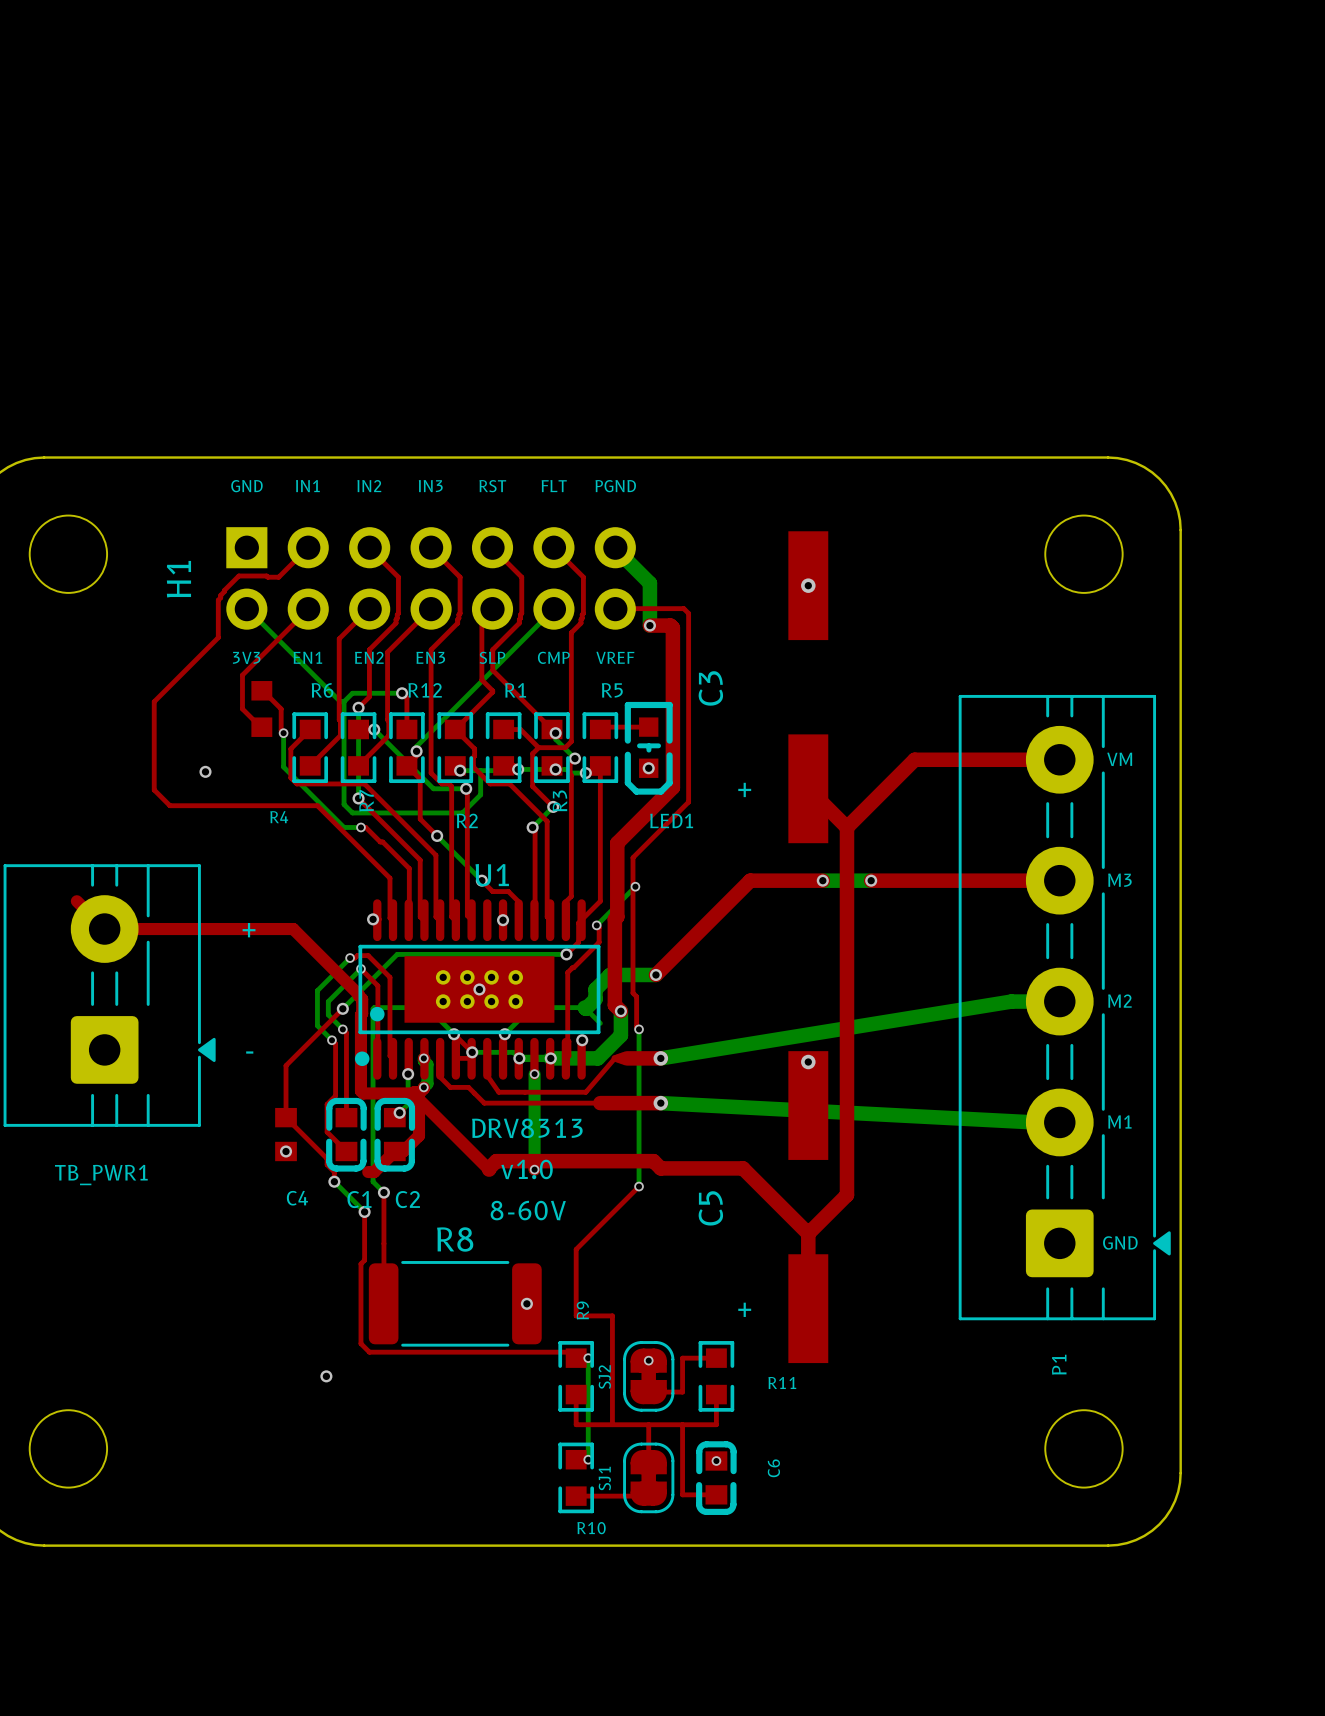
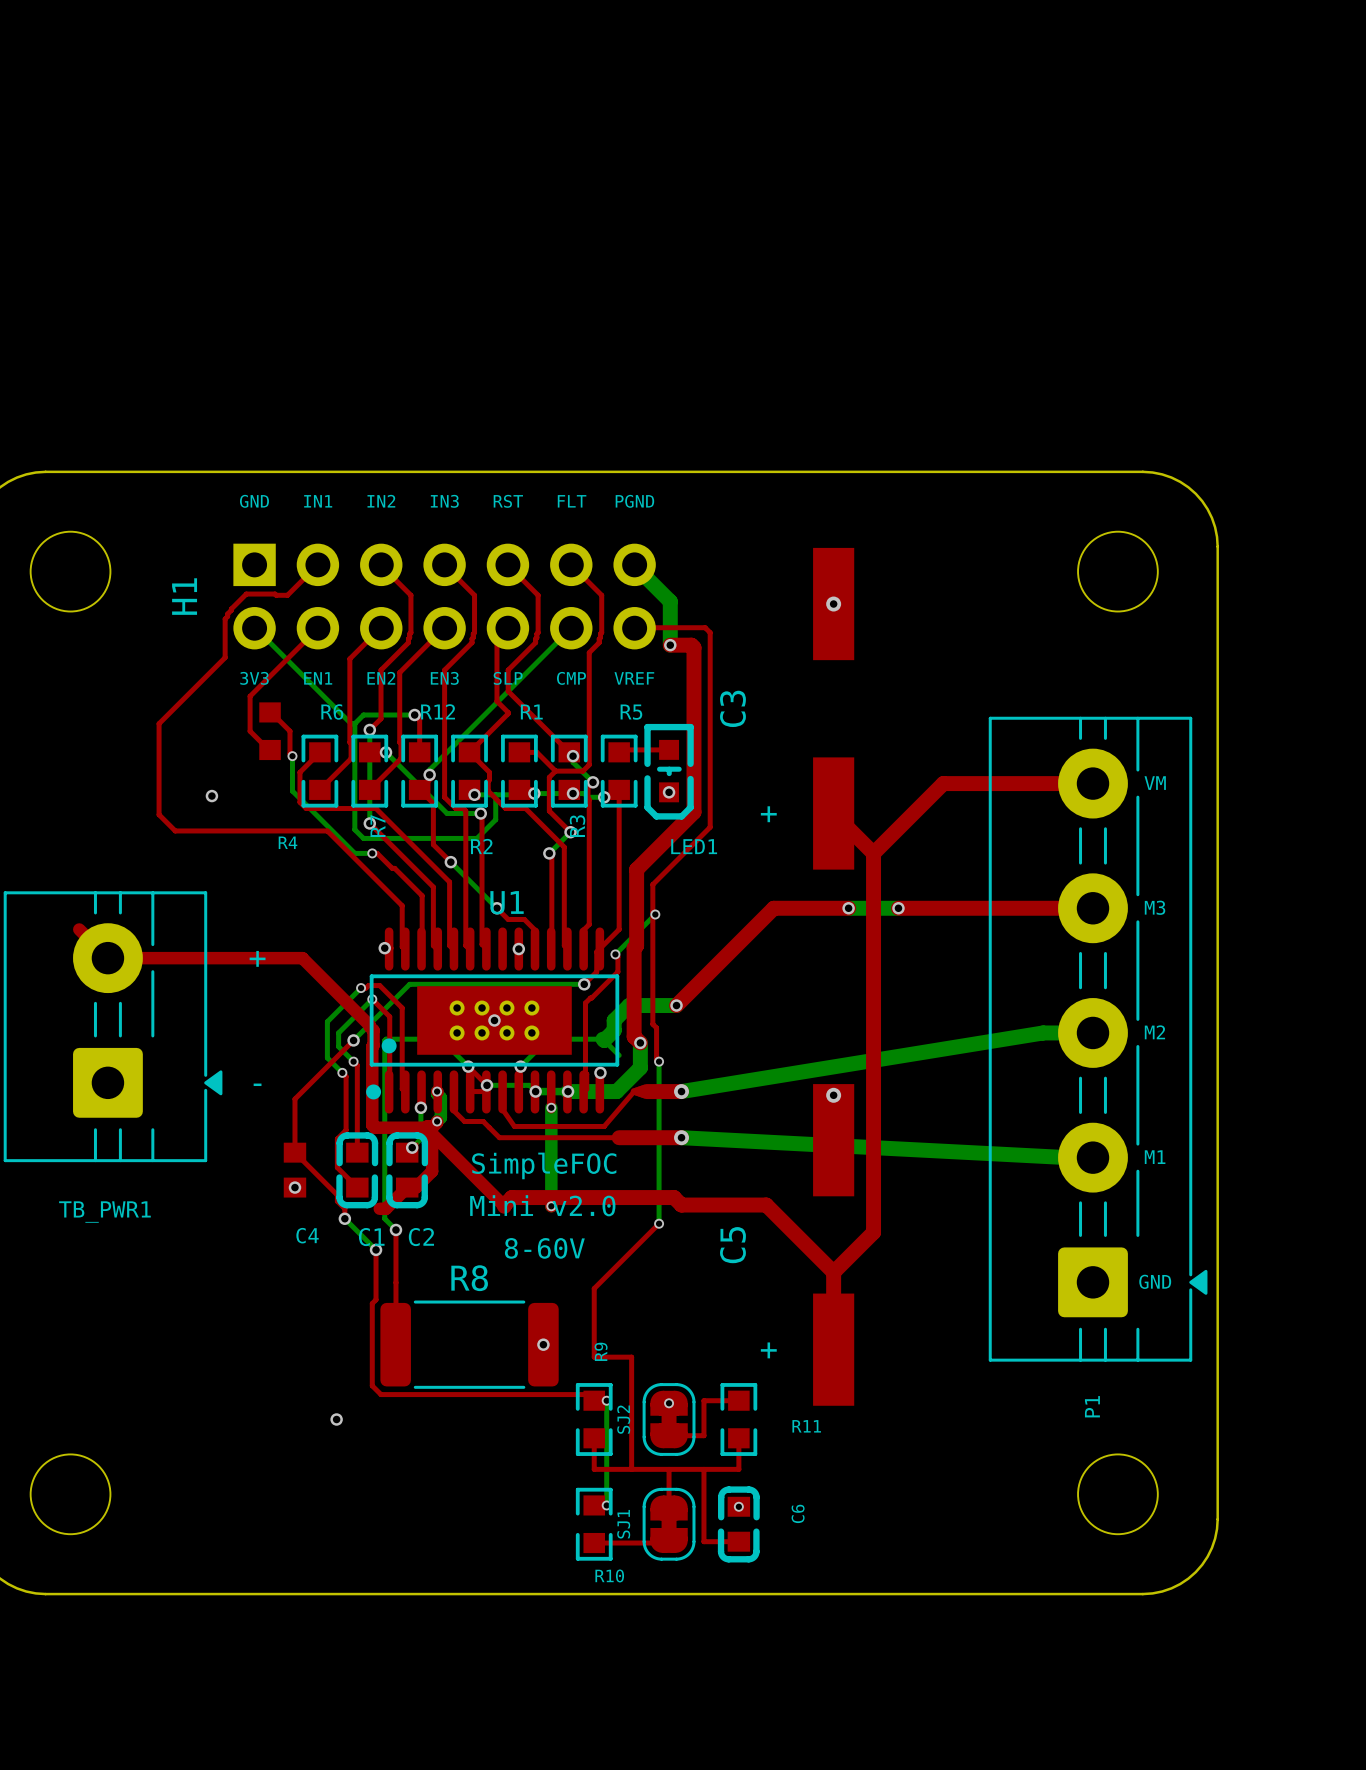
text: DRV8313 (527, 1128) -> SimpleFOC (544, 1165)
text: none -> Mini (501, 1205)
text: v1.0 (527, 1169) -> v2.0 (584, 1206)

